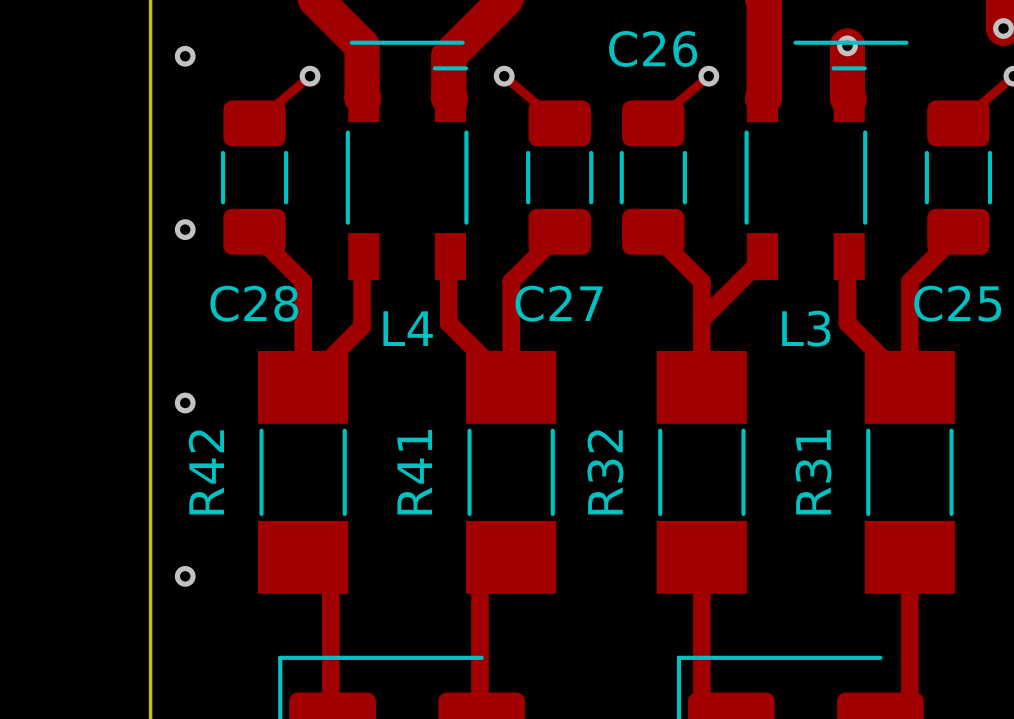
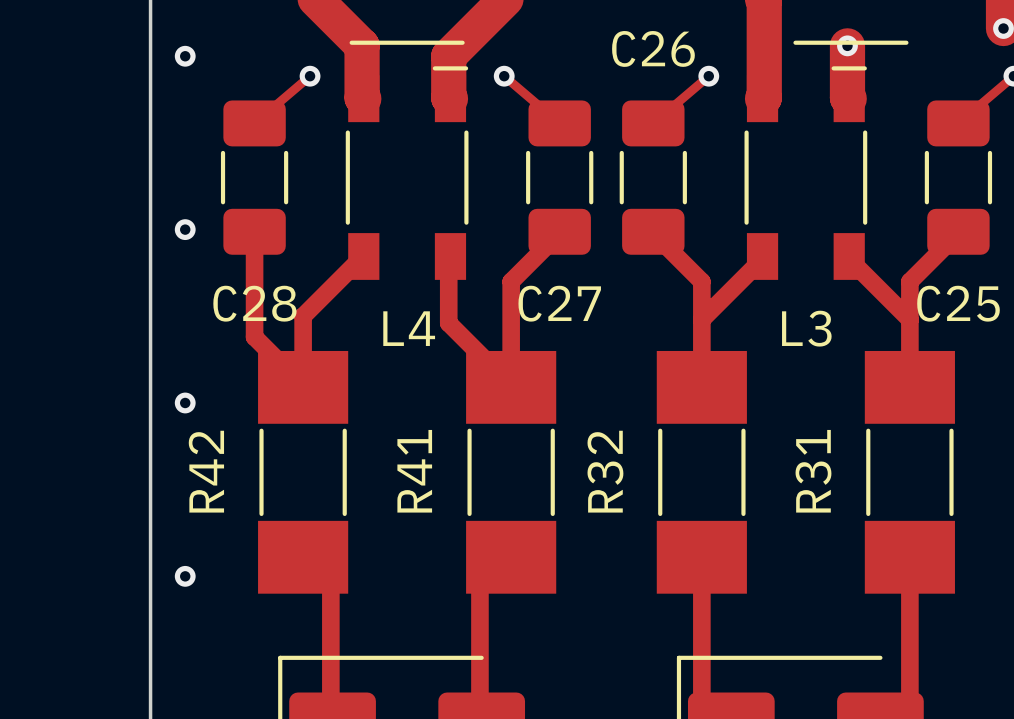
track: (254, 233) (303, 281) (303, 316) -> (254, 233) (254, 337) (303, 385)
track: (362, 257) (362, 326) (303, 385) -> (362, 257) (303, 316)
track: (847, 257) (847, 323) (909, 385) -> (847, 257) (909, 319)

